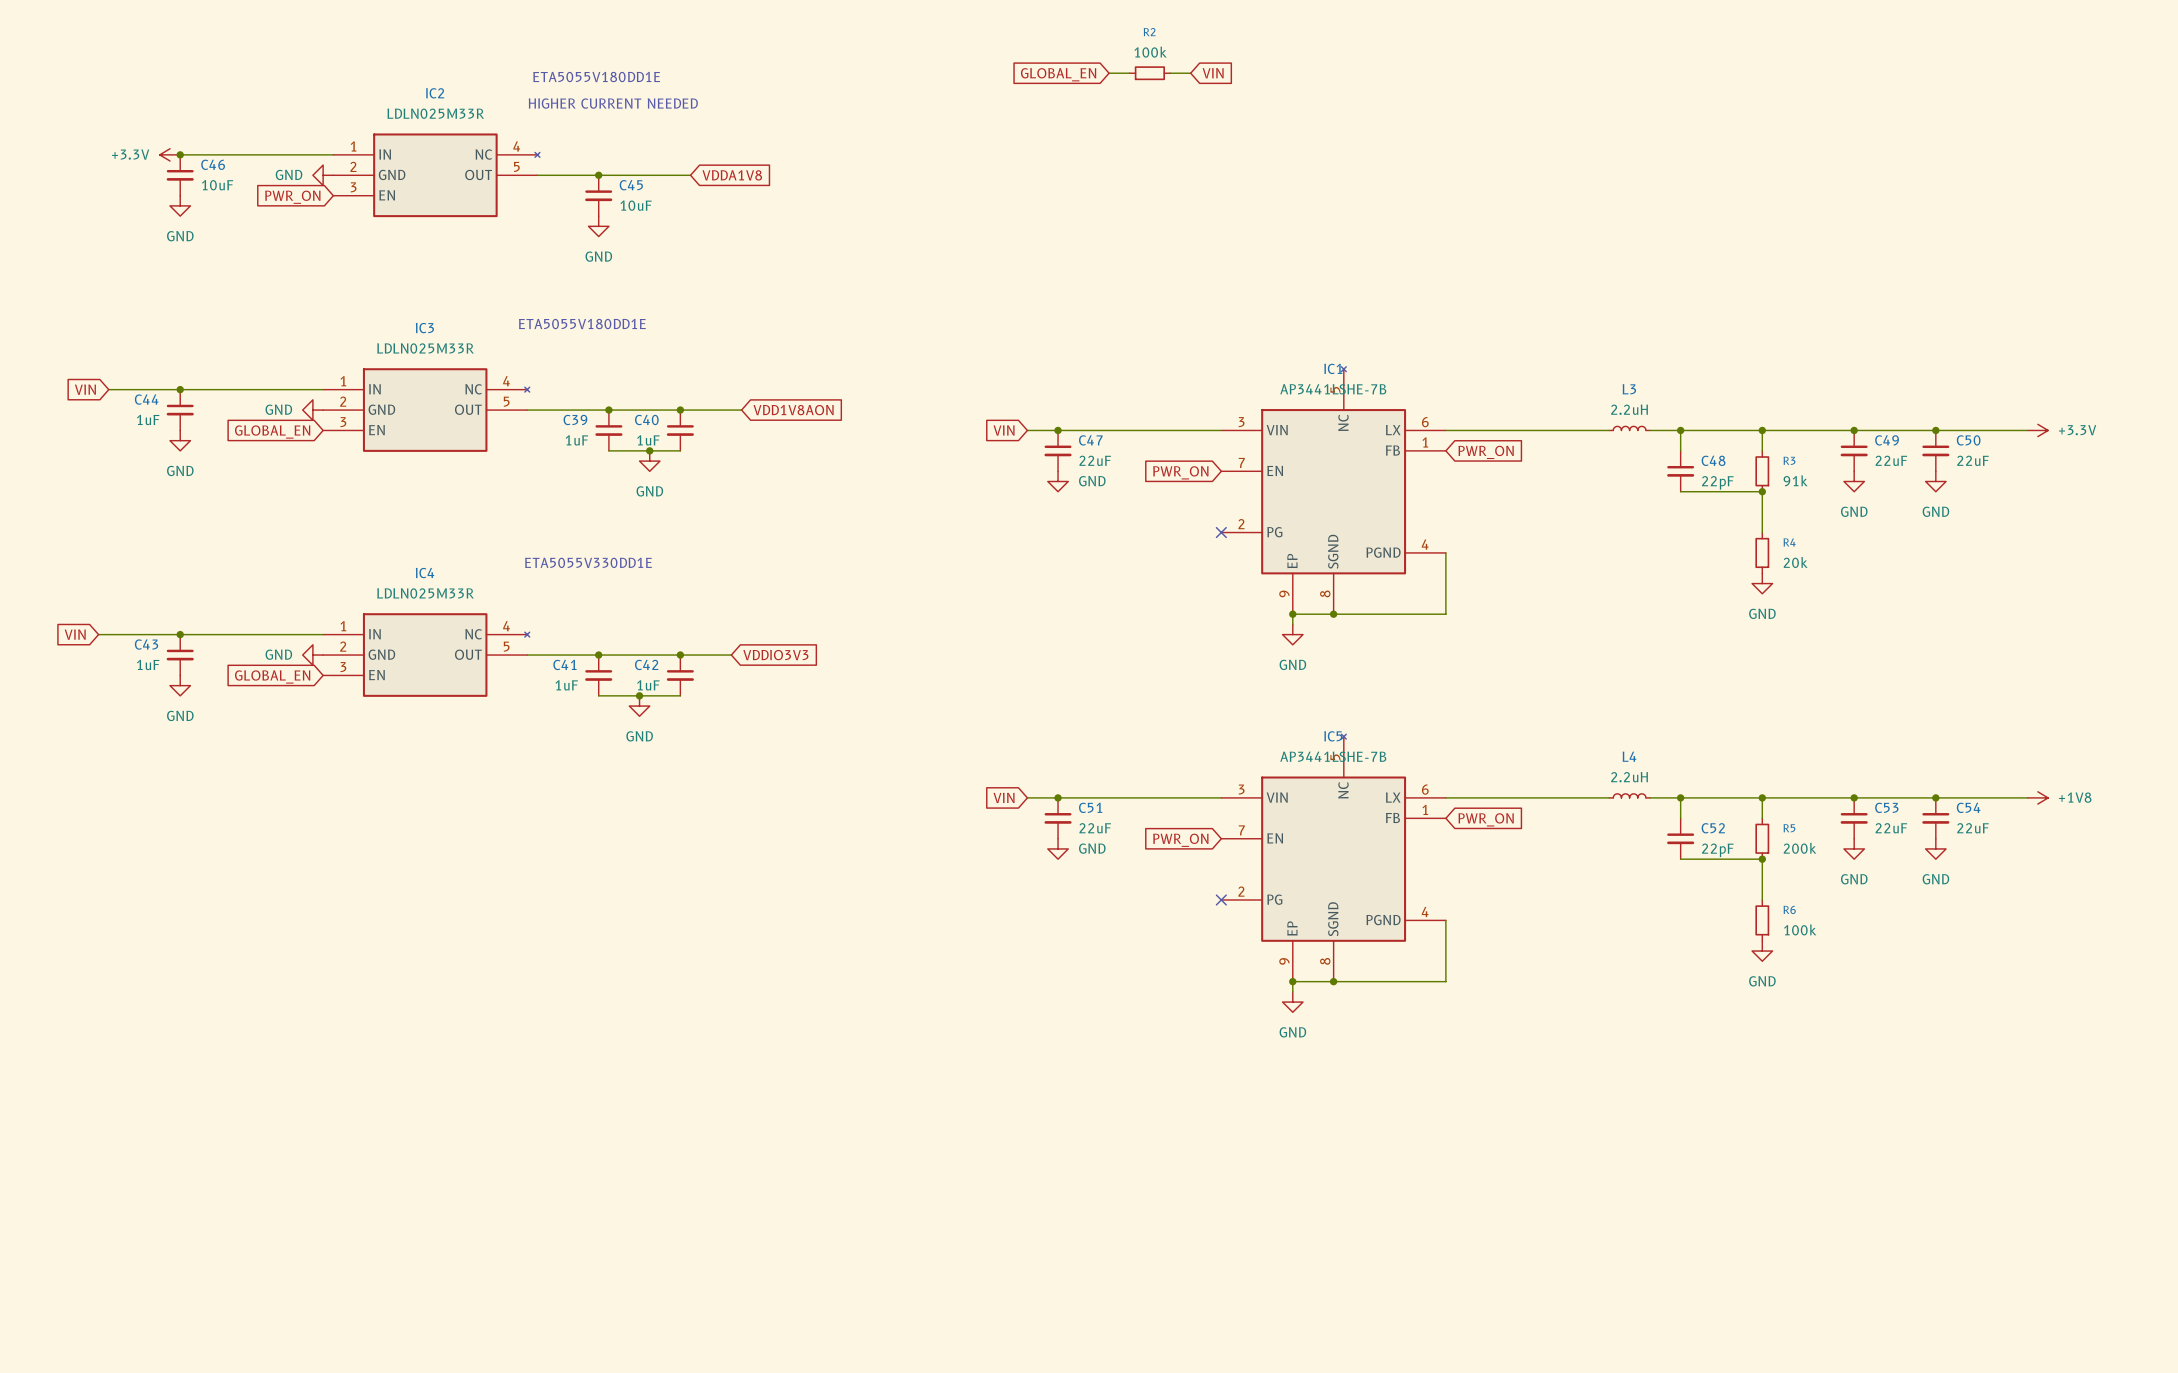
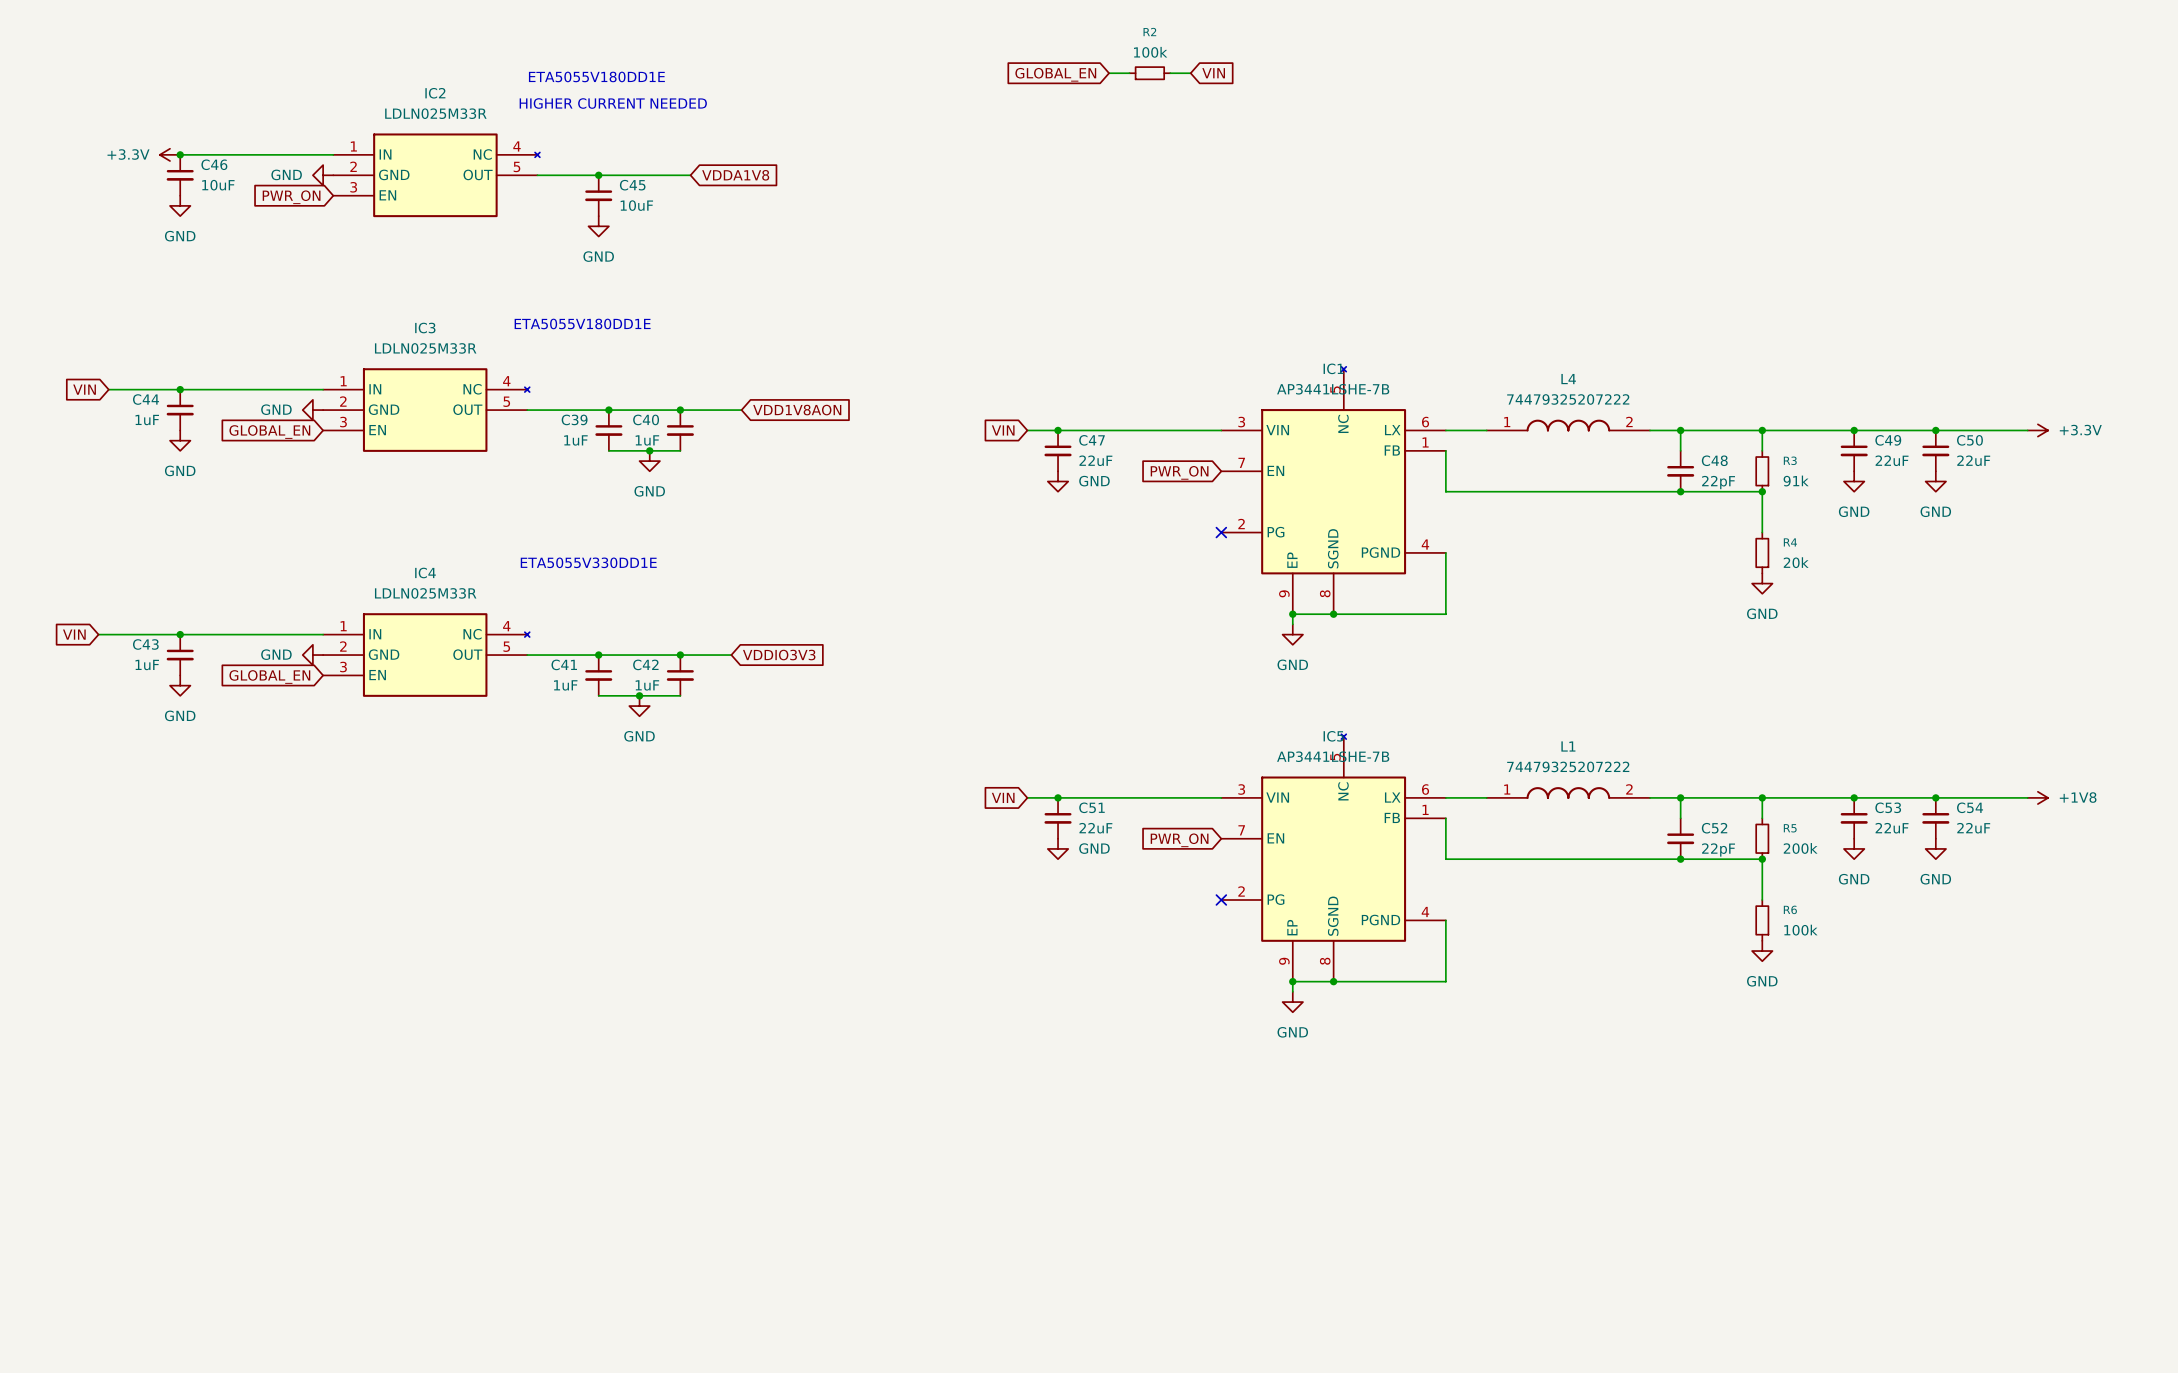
L3: 2.2uH (1629, 428) -> none
wire: (1486, 430) (1609, 430) -> none
wire: none -> (1445, 450) (1445, 491) (1680, 491)
global label: PWR_ON (1486, 452) -> none
junction: none -> (1680, 491)
L4 value: 2.2uH (1629, 777) -> 74479325207222 (1568, 399)
L1: none -> 74479325207222 (1568, 793)
L4 symbol: [1609, 793, 1651, 798] -> [1486, 419, 1651, 432]
wire: (1486, 797) (1609, 797) -> none
wire: none -> (1445, 818) (1445, 859) (1680, 859)
global label: PWR_ON (1486, 819) -> none
junction: none -> (1680, 859)

